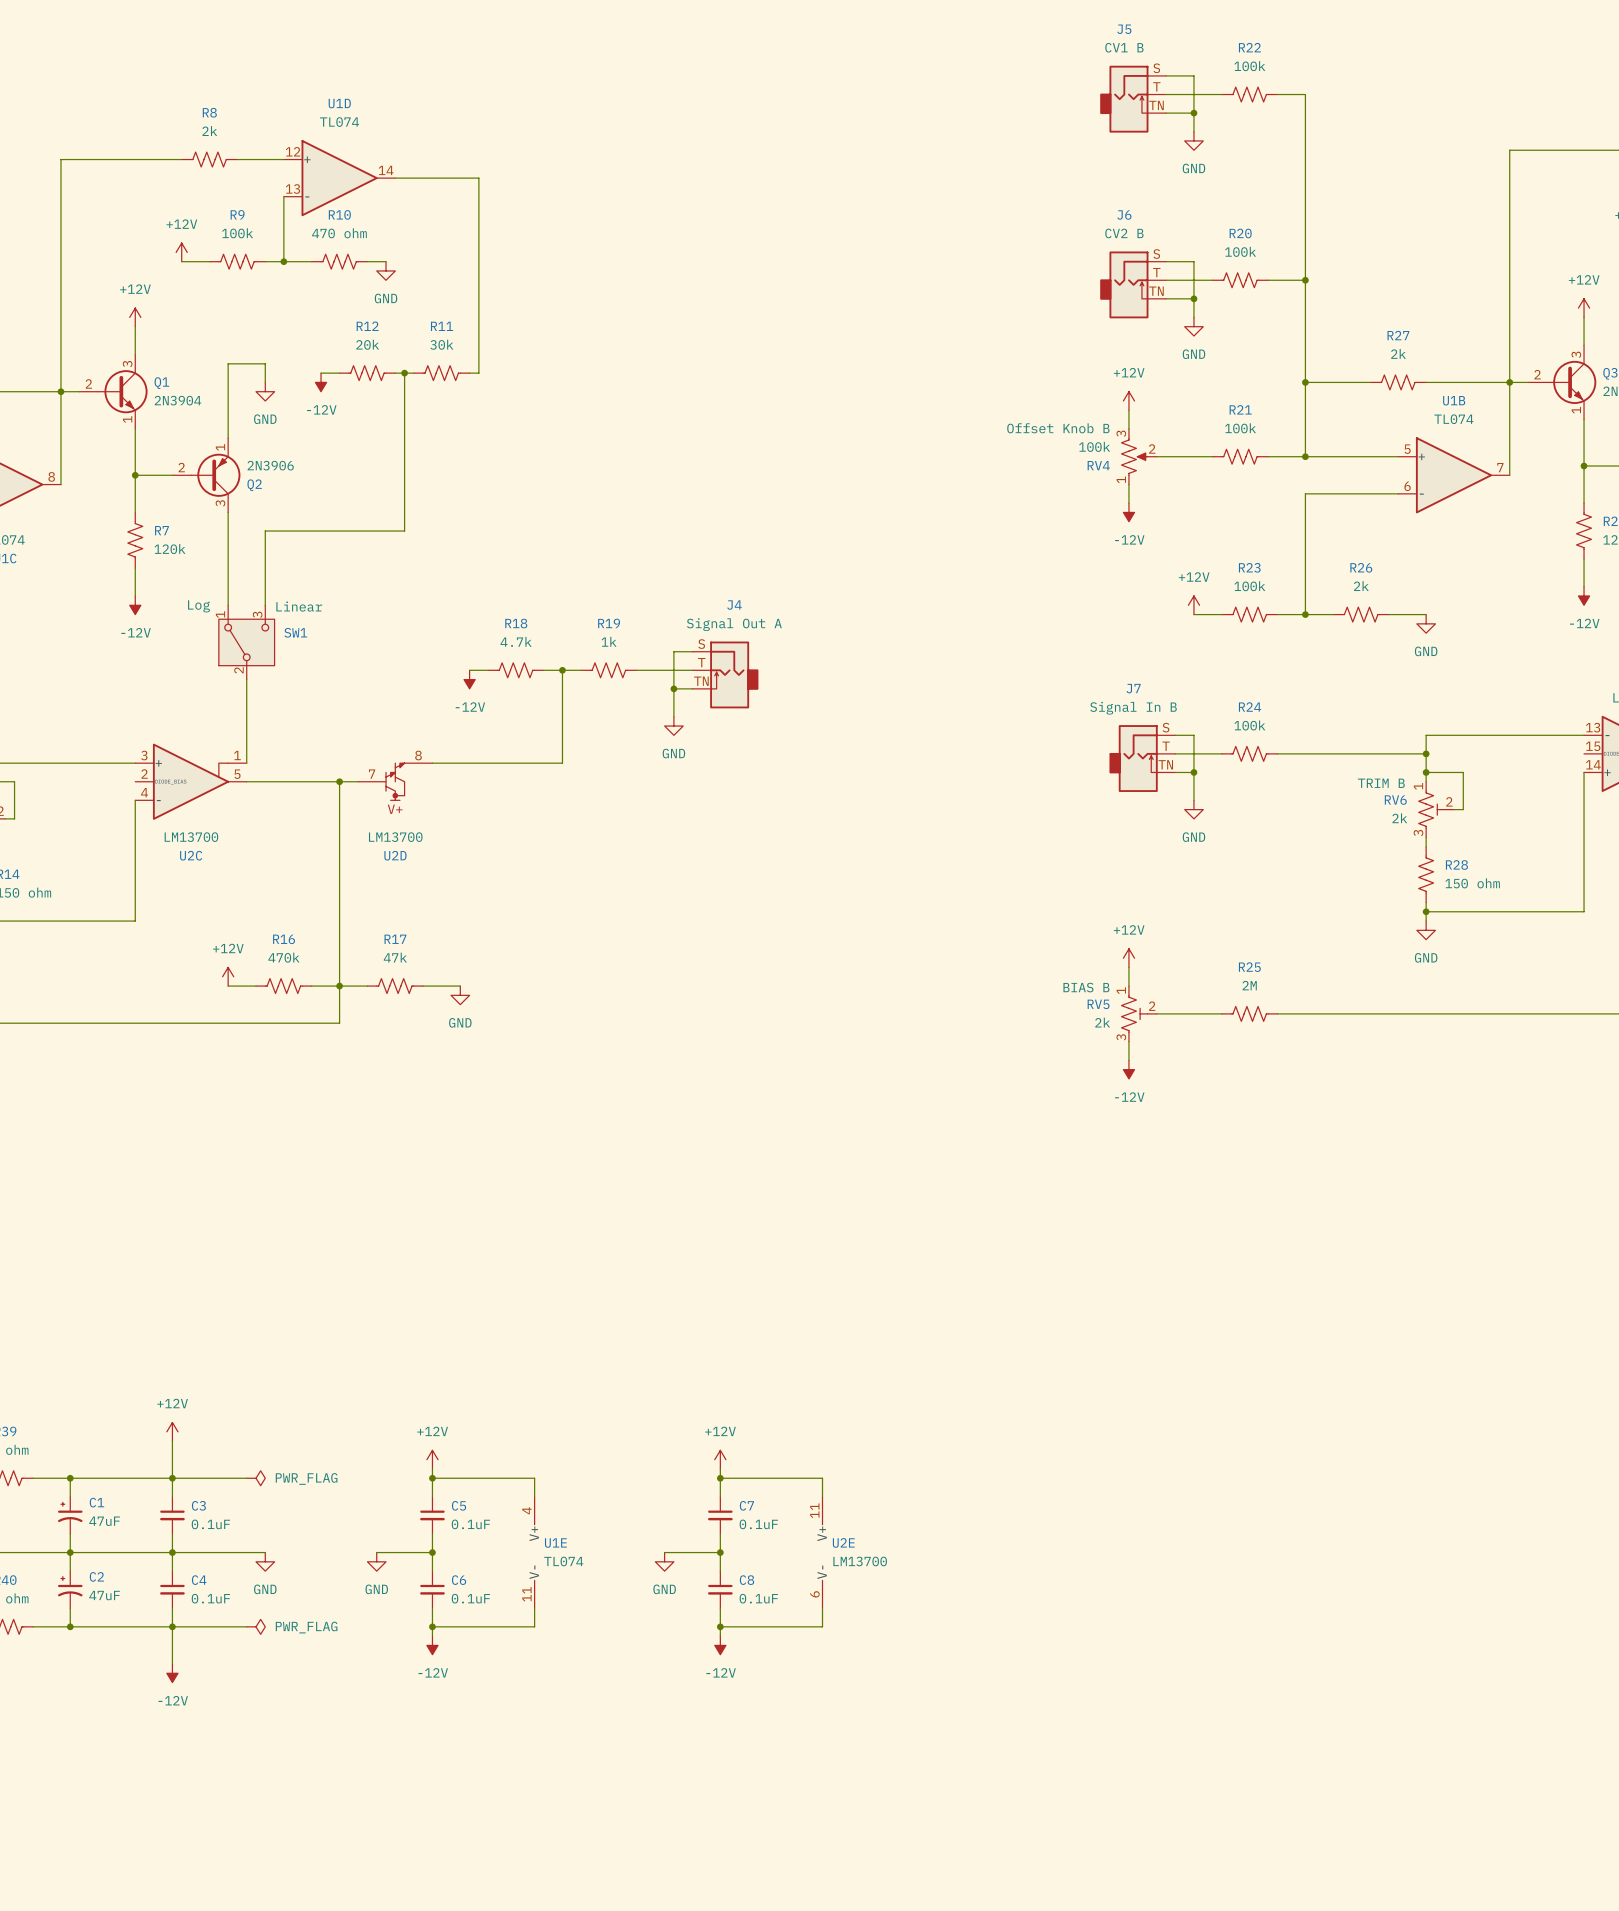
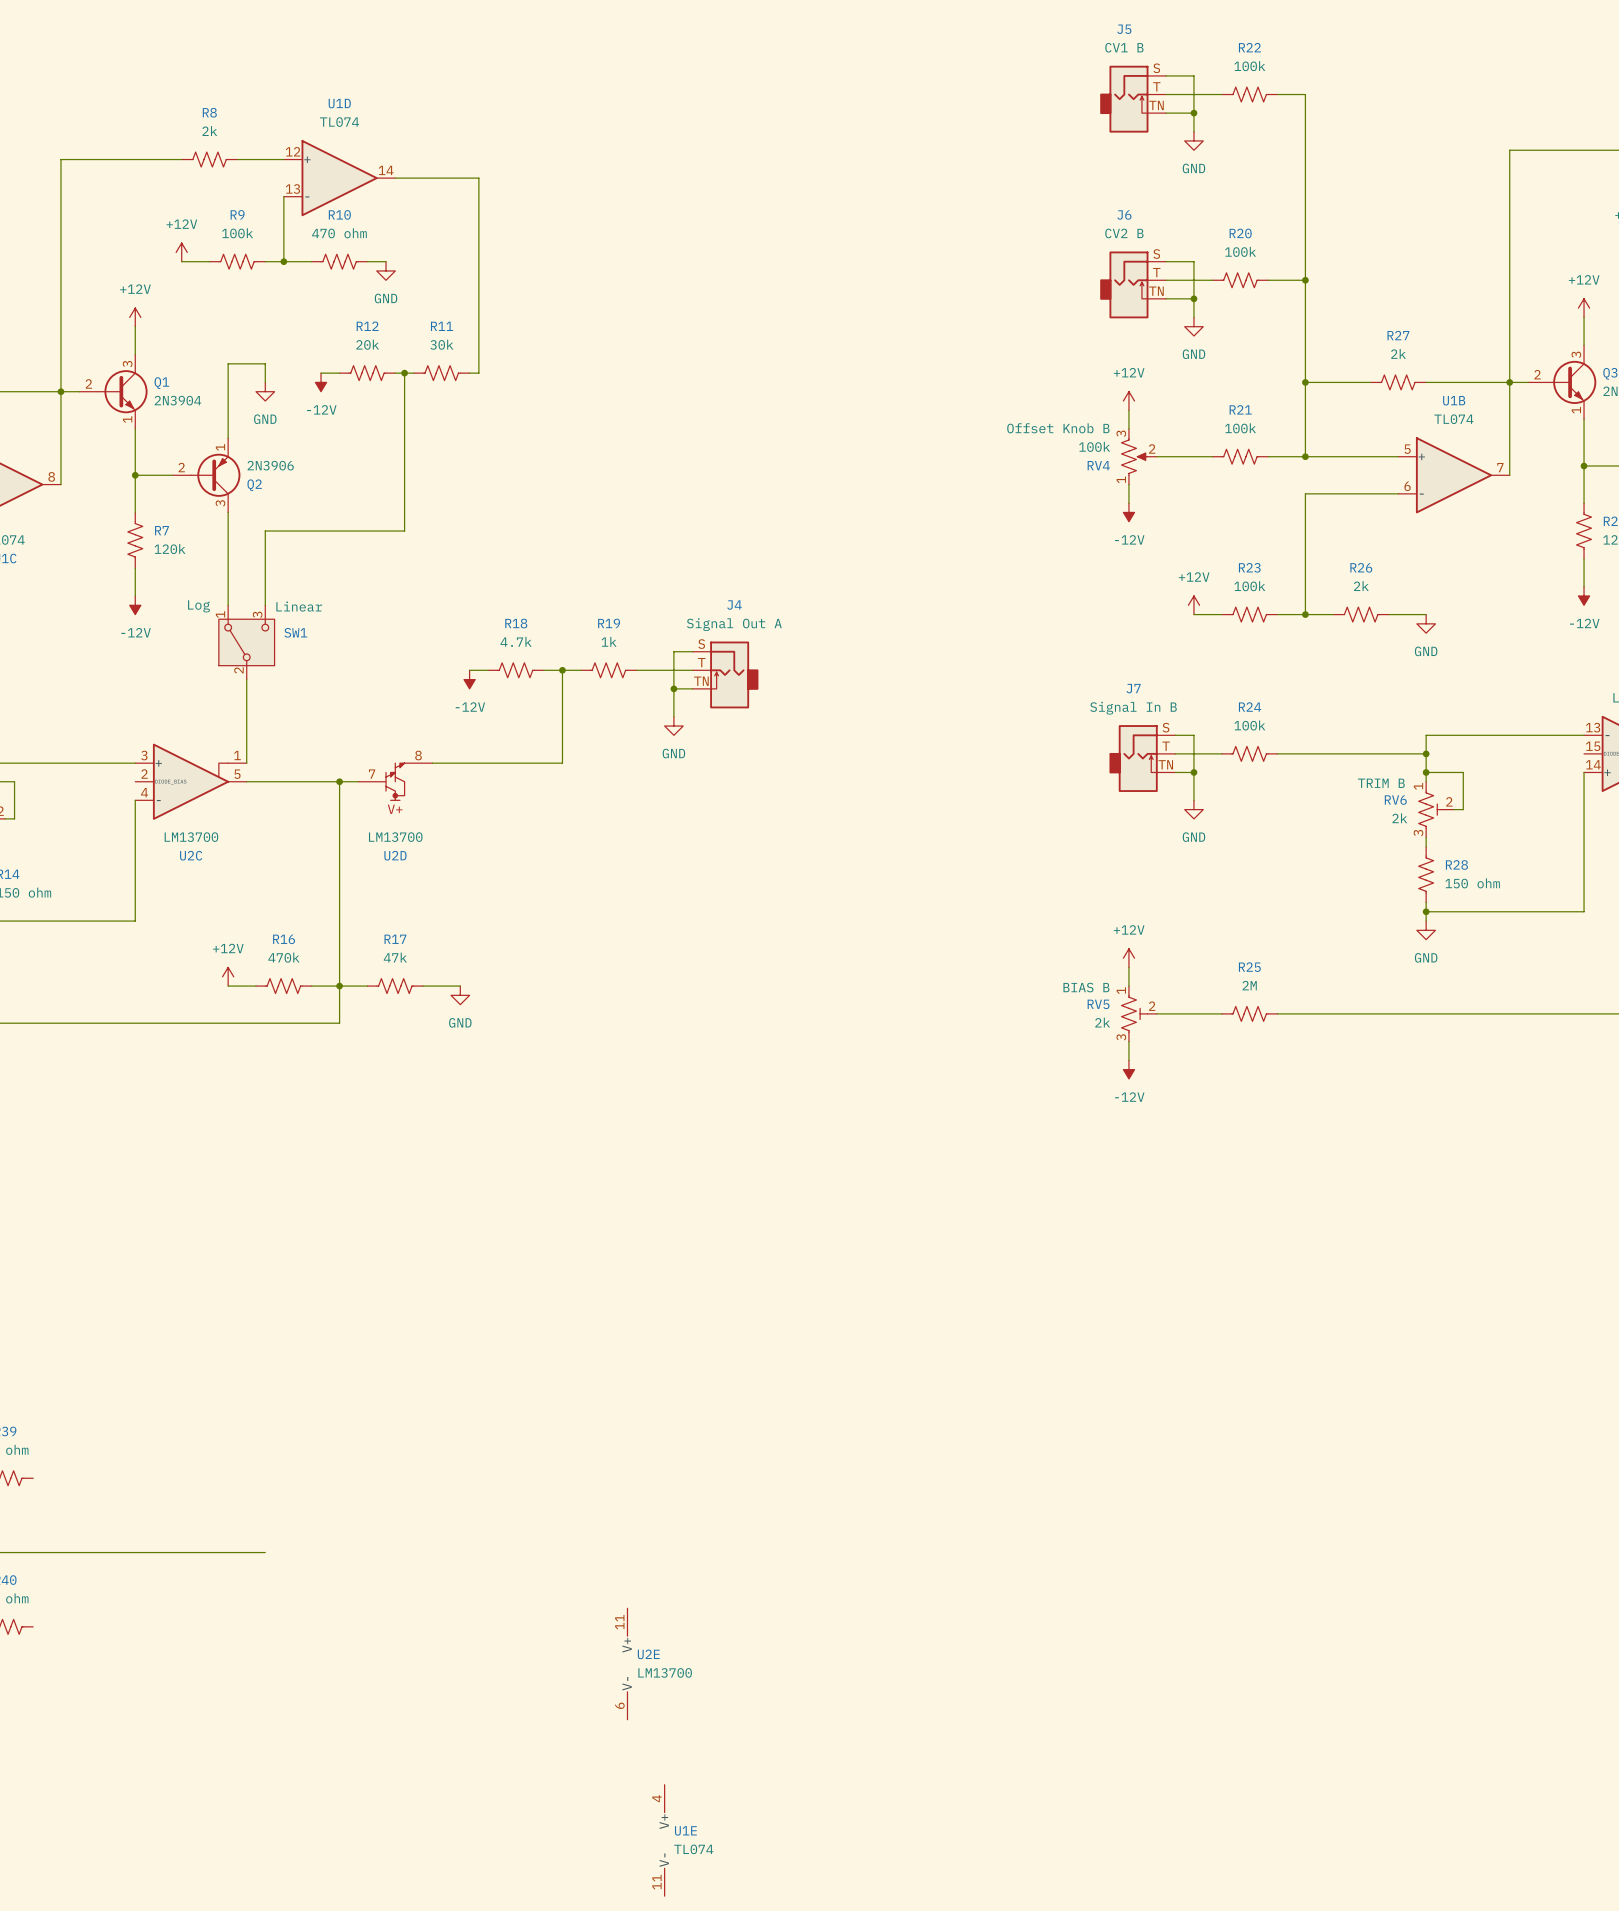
power symbol: +12V (172, 1431) -> none
wire: (172, 1441) (172, 1496) -> none
power symbol: +12V (432, 1459) -> none
power symbol: +12V (720, 1459) -> none
wire: (432, 1468) (432, 1496) -> none
wire: (720, 1468) (720, 1496) -> none
wire: (33, 1478) (246, 1478) -> none
wire: (70, 1478) (70, 1496) -> none
junction: (70, 1478) -> none
junction: (172, 1478) -> none
power symbol: PWR_FLAG (256, 1478) -> none
wire: (432, 1478) (534, 1478) (534, 1496) -> none
junction: (432, 1478) -> none
wire: (720, 1478) (822, 1478) (822, 1496) -> none
junction: (720, 1478) -> none
C1: 47uF (70, 1515) -> none
C3: 0.1uF (172, 1515) -> none
C5: 0.1uF (432, 1515) -> none
C7: 0.1uF (720, 1515) -> none
wire: (70, 1533) (70, 1571) -> none
wire: (172, 1533) (172, 1571) -> none
wire: (432, 1533) (432, 1571) -> none
wire: (720, 1533) (720, 1571) -> none
junction: (70, 1552) -> none
junction: (172, 1552) -> none
wire: (376, 1552) (432, 1552) -> none
junction: (432, 1552) -> none
U1E position: (534, 1552) -> (664, 1840)
wire: (664, 1552) (720, 1552) -> none
junction: (720, 1552) -> none
U2E position: (822, 1552) -> (627, 1663)
power symbol: GND (265, 1561) -> none
power symbol: GND (376, 1561) -> none
power symbol: GND (664, 1561) -> none
C2: 47uF (70, 1589) -> none
C4: 0.1uF (172, 1589) -> none
C6: 0.1uF (432, 1589) -> none
C8: 0.1uF (720, 1589) -> none
wire: (70, 1608) (70, 1626) -> none
wire: (172, 1608) (172, 1663) -> none
wire: (432, 1608) (432, 1636) -> none
wire: (534, 1608) (534, 1626) (432, 1626) -> none
wire: (720, 1608) (720, 1636) -> none
wire: (822, 1608) (822, 1626) (720, 1626) -> none
wire: (33, 1626) (246, 1626) -> none
junction: (70, 1626) -> none
junction: (172, 1626) -> none
power symbol: PWR_FLAG (256, 1626) -> none
junction: (432, 1626) -> none
junction: (720, 1626) -> none
power symbol: -12V (432, 1645) -> none
power symbol: -12V (720, 1645) -> none
power symbol: -12V (172, 1673) -> none

